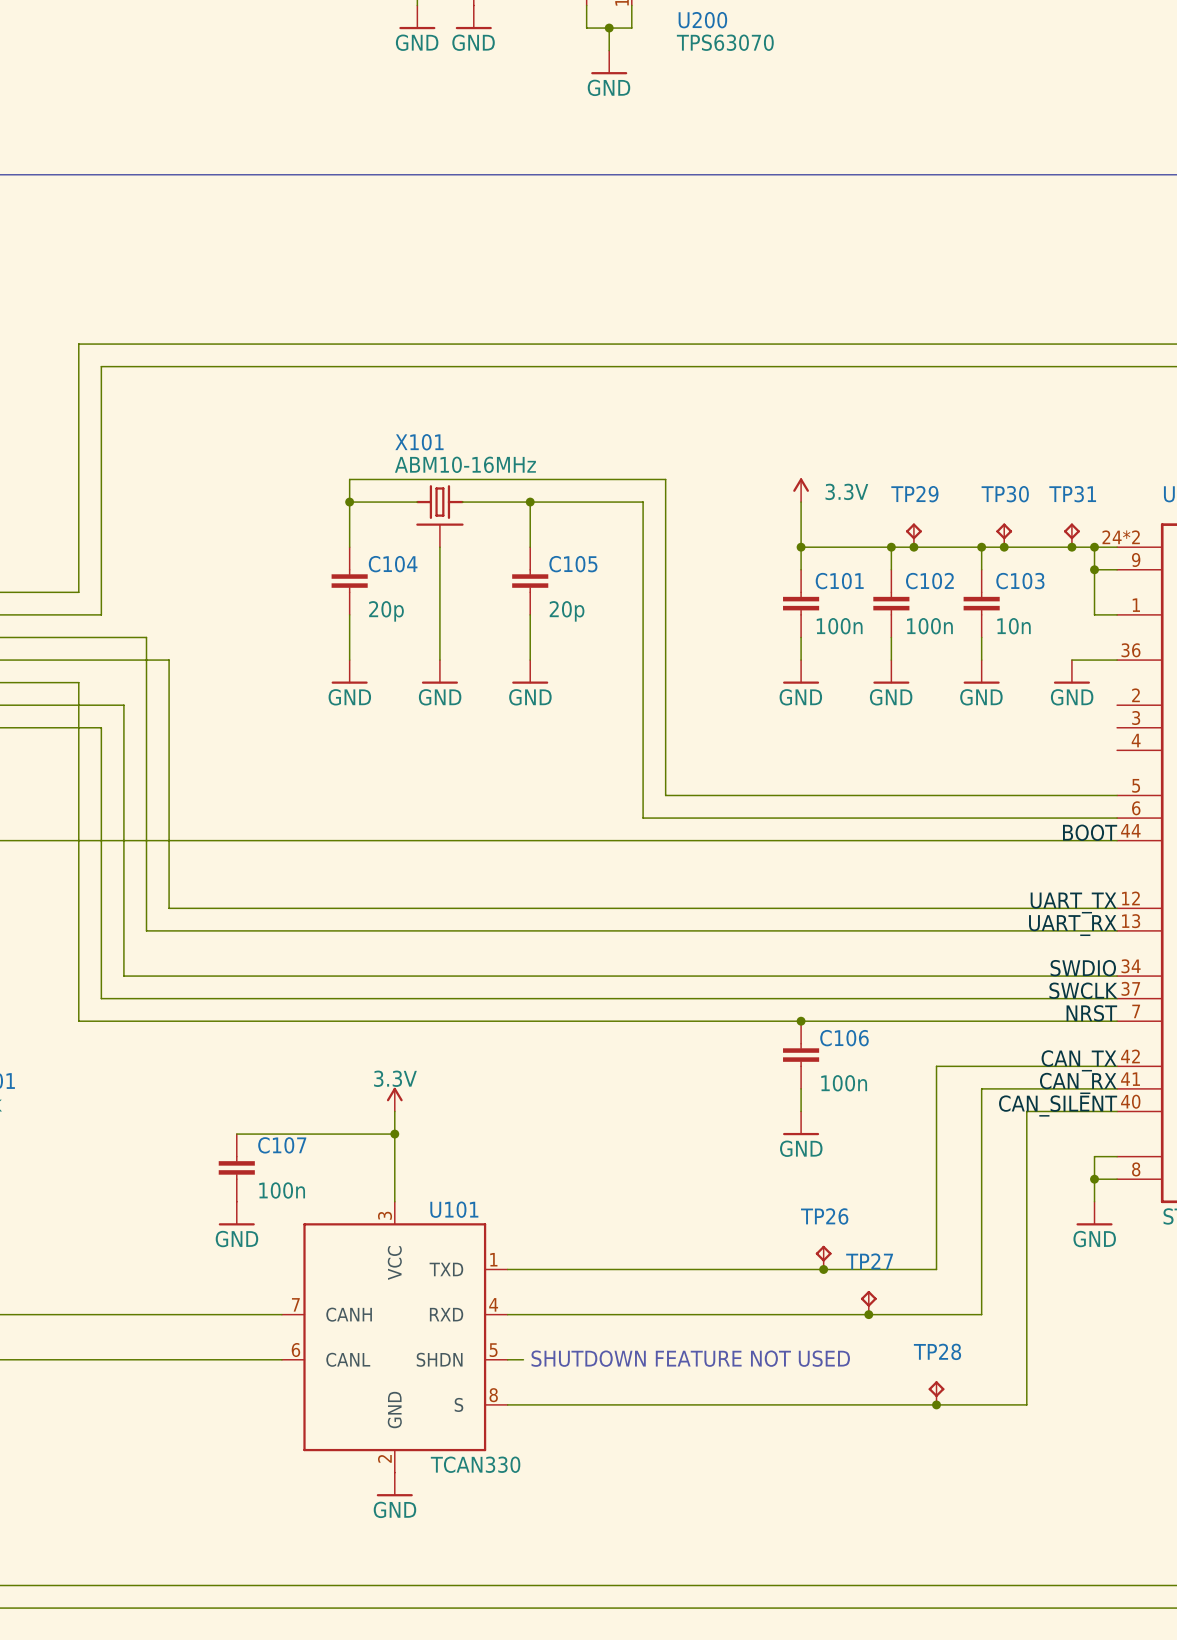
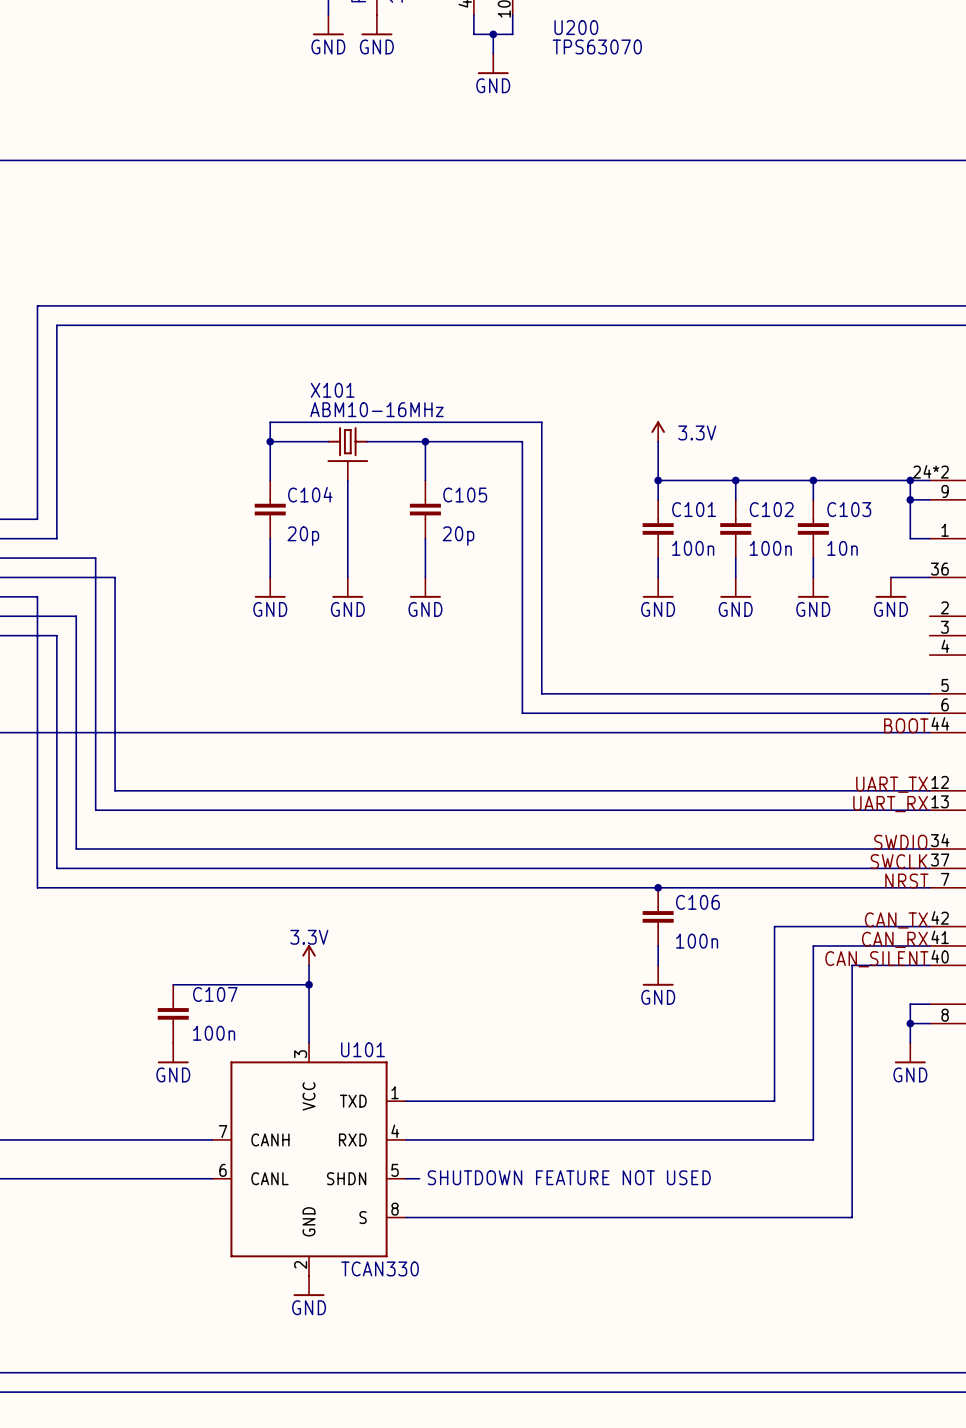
TP29: (913, 535) -> none
TP30: (1004, 535) -> none
TP31: (1071, 535) -> none
junction: (913, 547) -> none
junction: (1004, 547) -> none
junction: (1071, 547) -> none
TP26: (823, 1257) -> none
junction: (823, 1269) -> none
TP27: (868, 1302) -> none
junction: (868, 1314) -> none
TP28: (936, 1393) -> none
junction: (936, 1404) -> none

